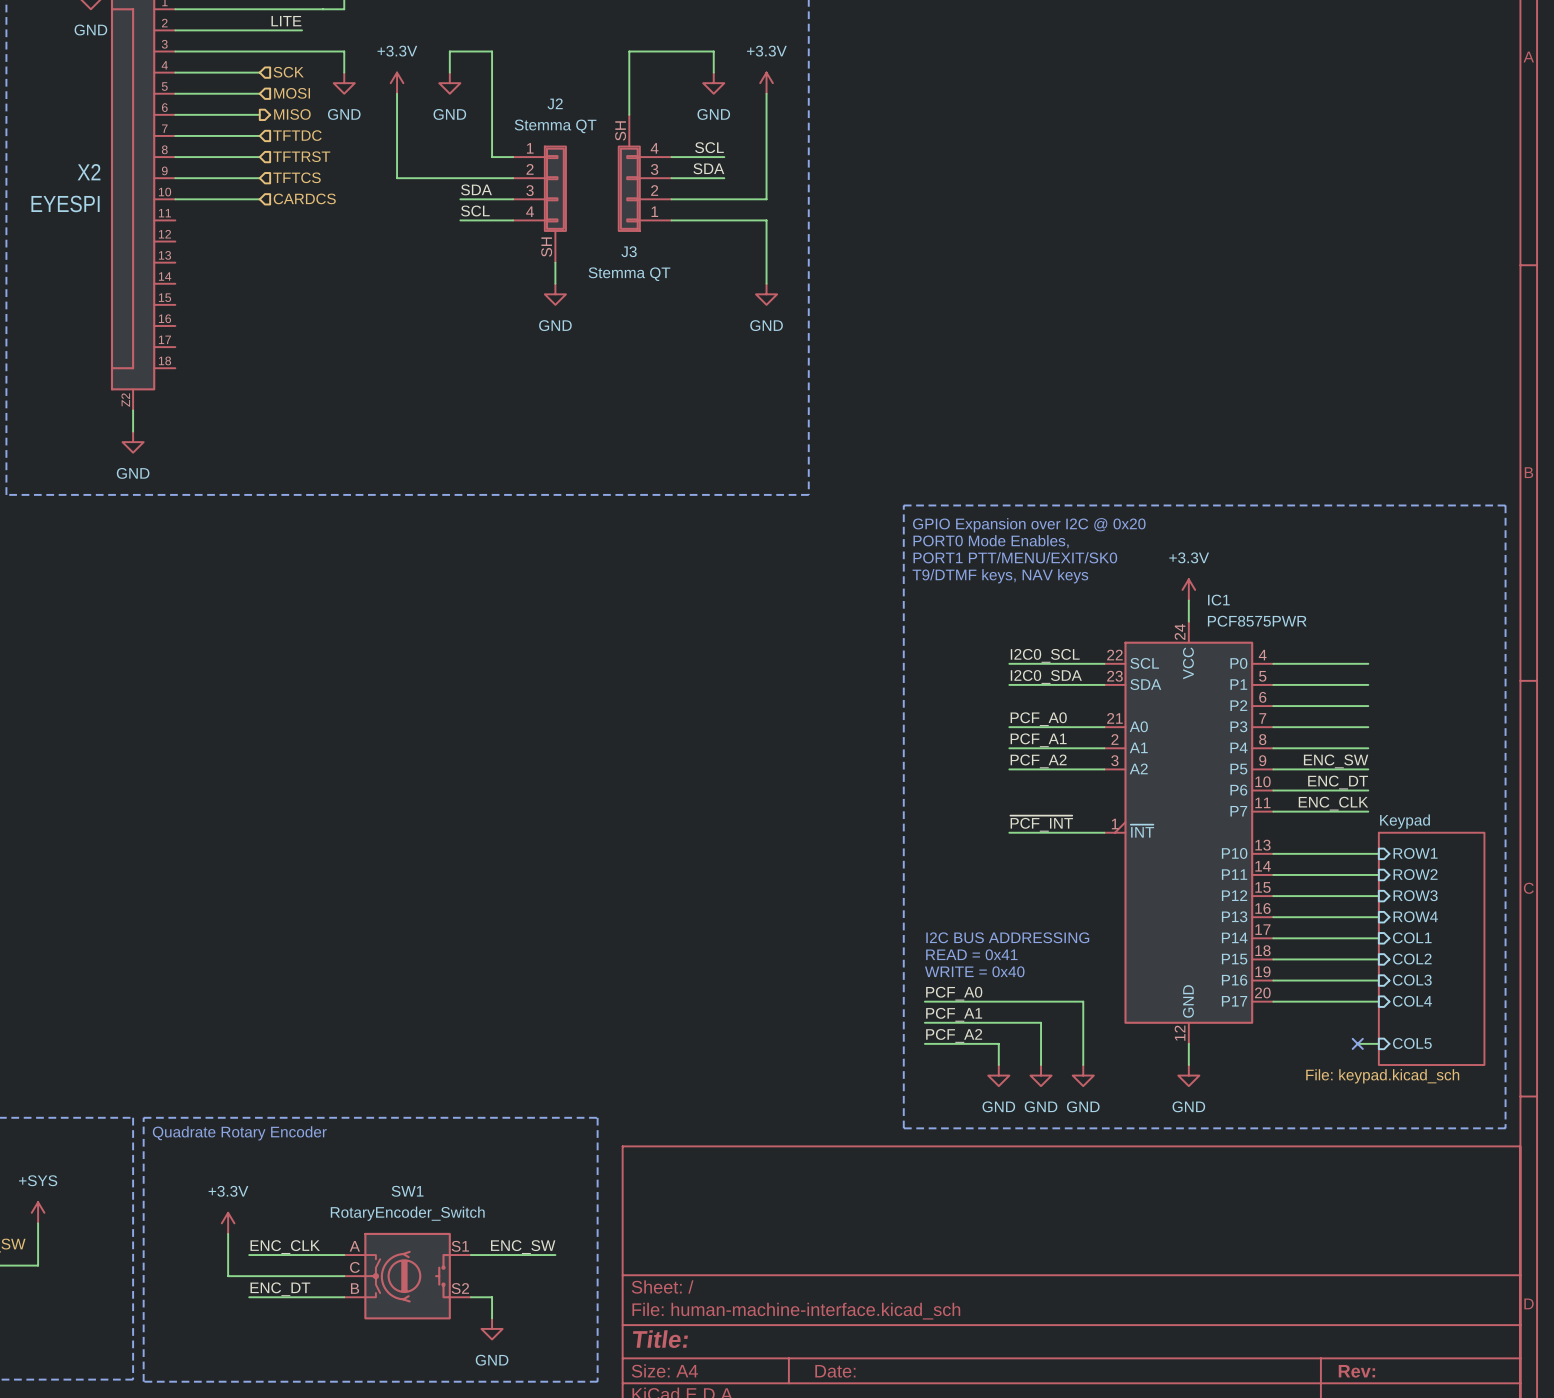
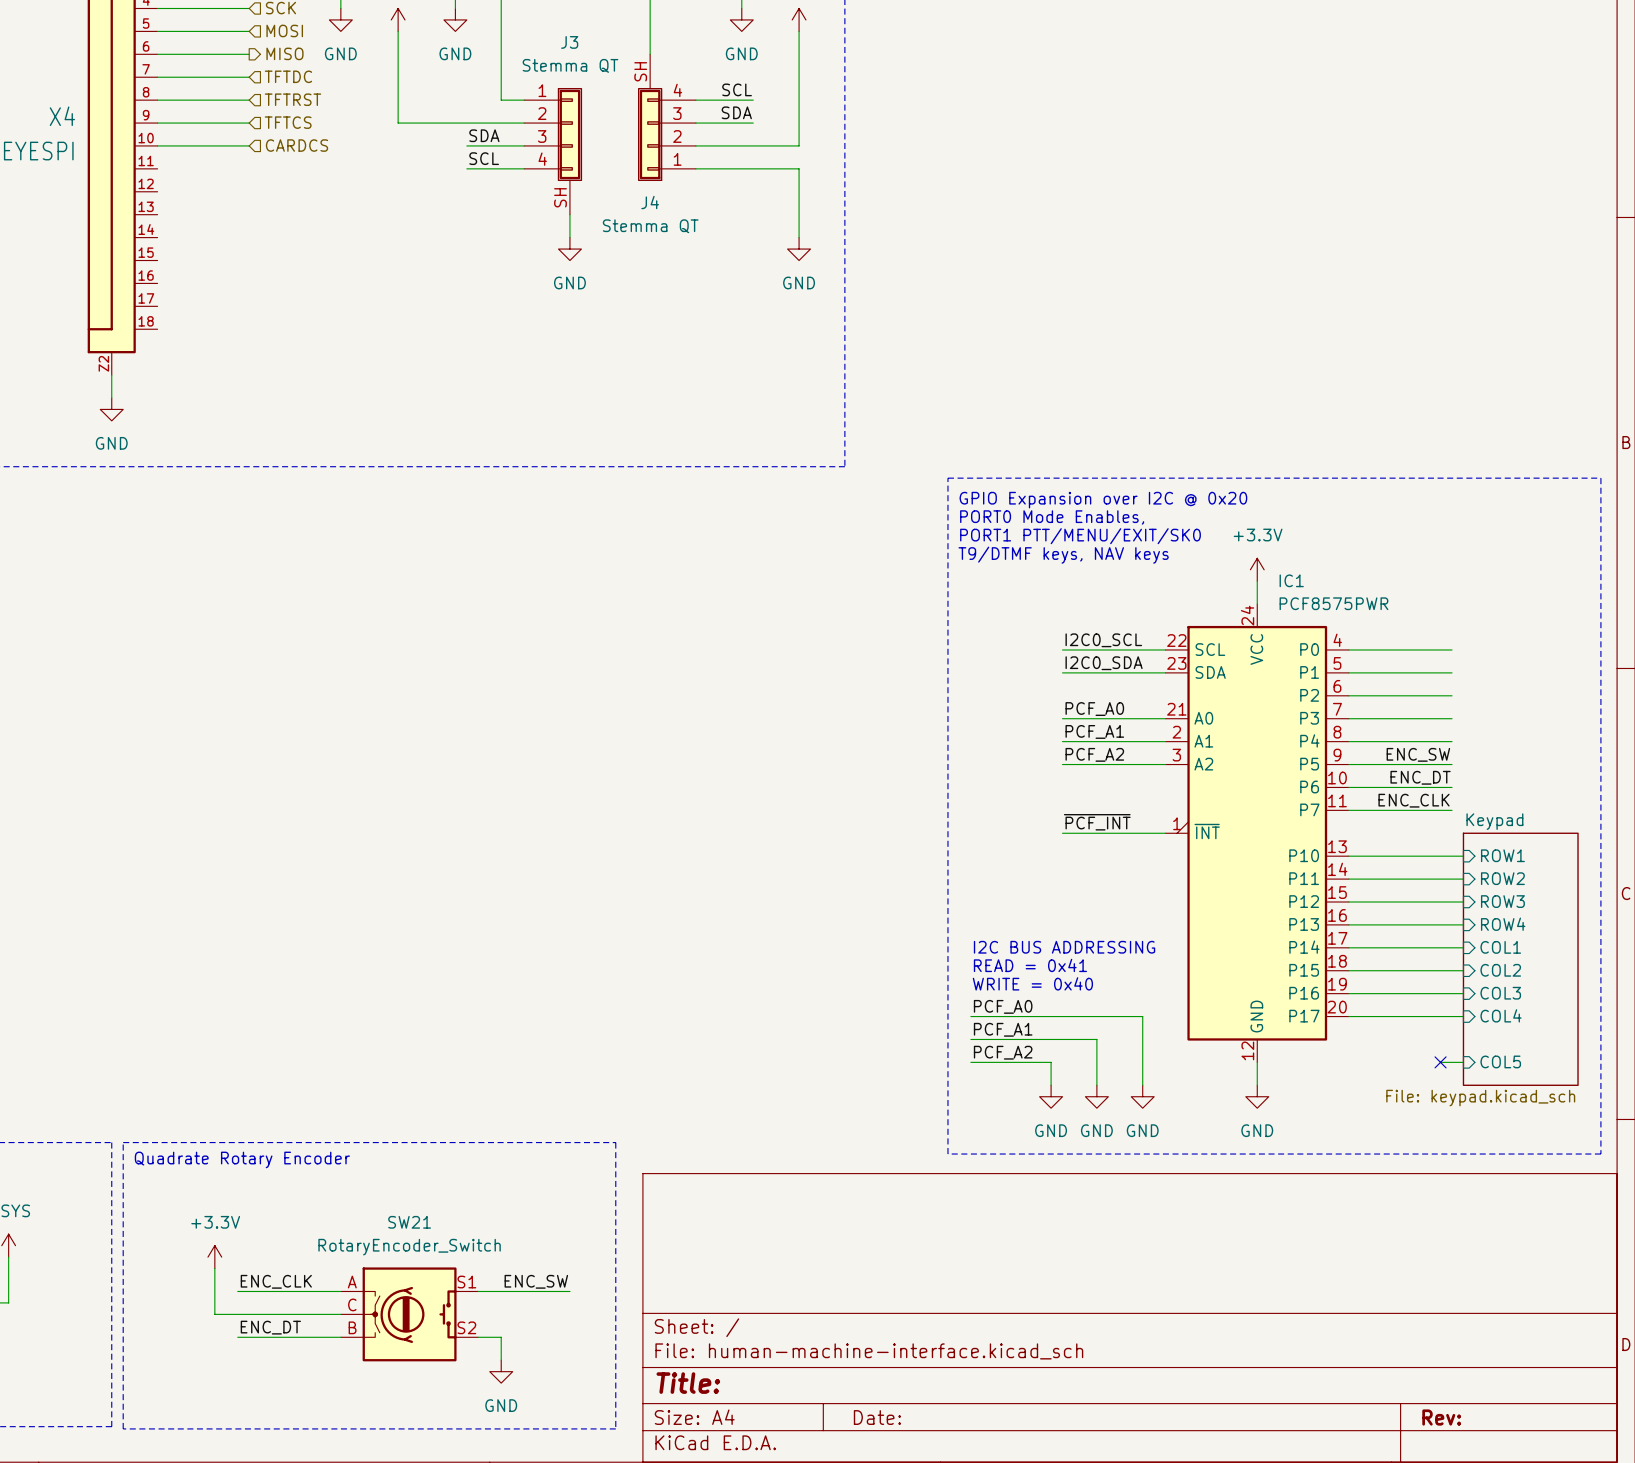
J2 name: J2 (555, 103) -> J3 (569, 42)
X2 name: X2 (89, 172) -> X4 (62, 116)
J3 name: J3 (629, 251) -> J4 (650, 202)
SW1 name: SW1 (407, 1191) -> SW21 (409, 1222)

